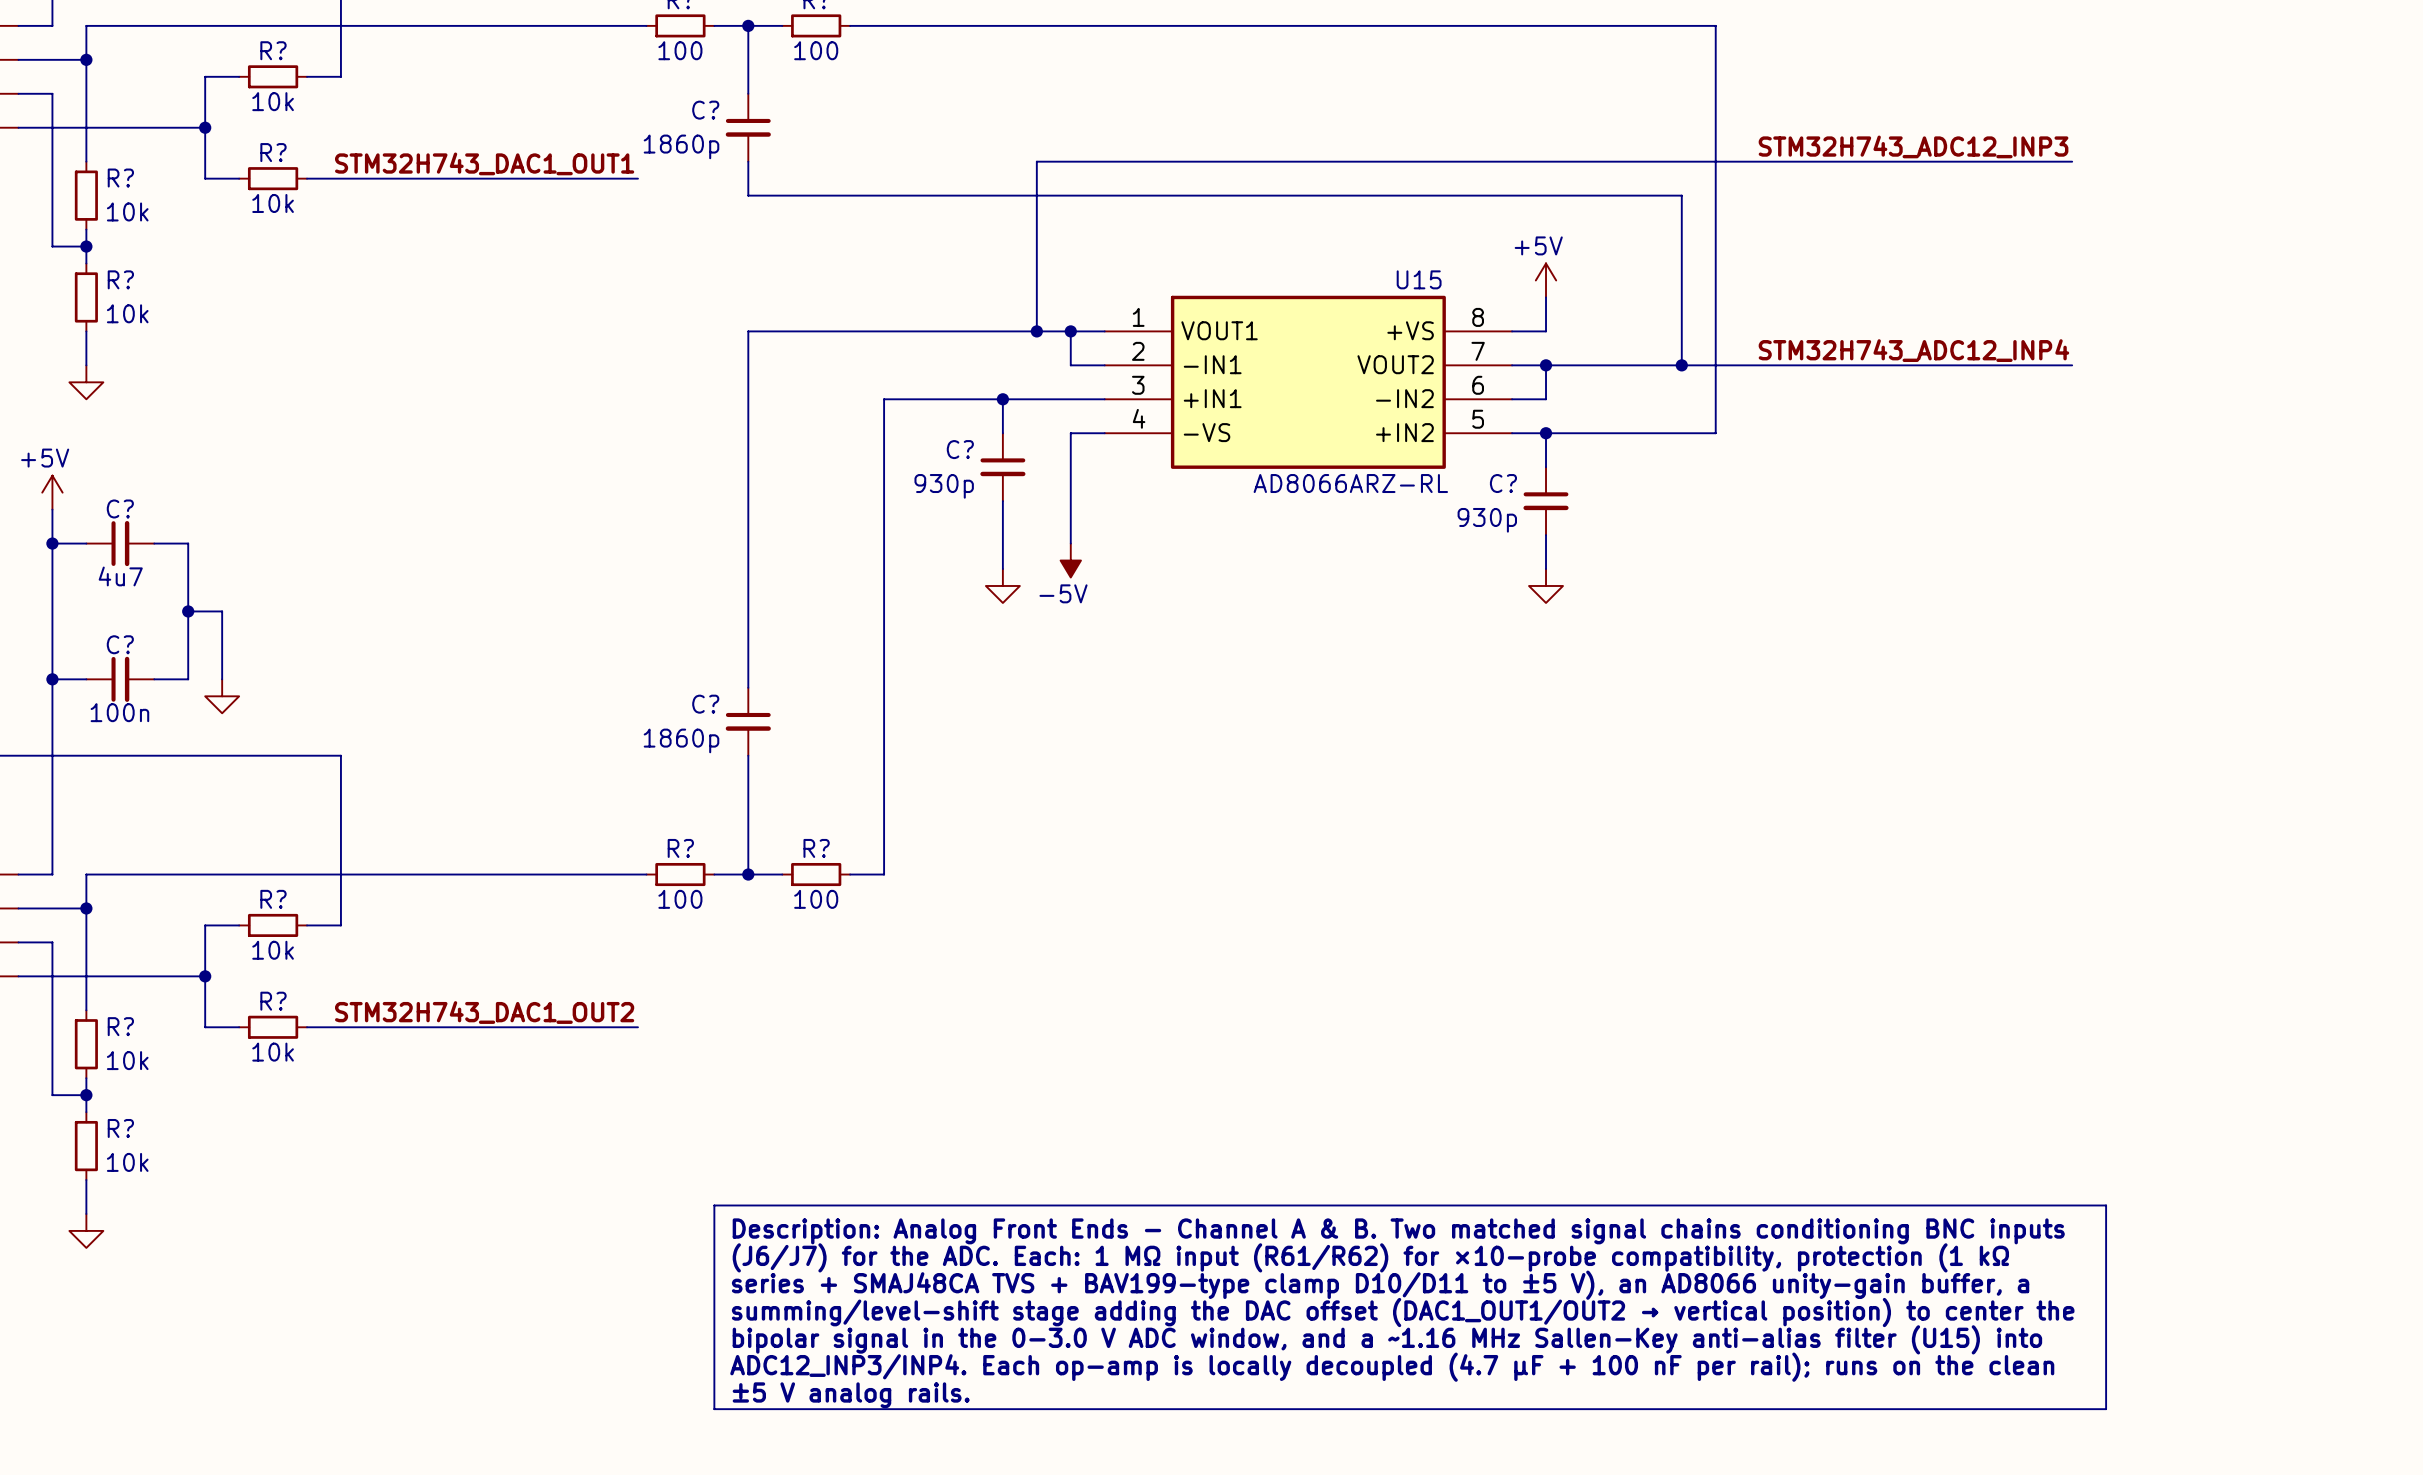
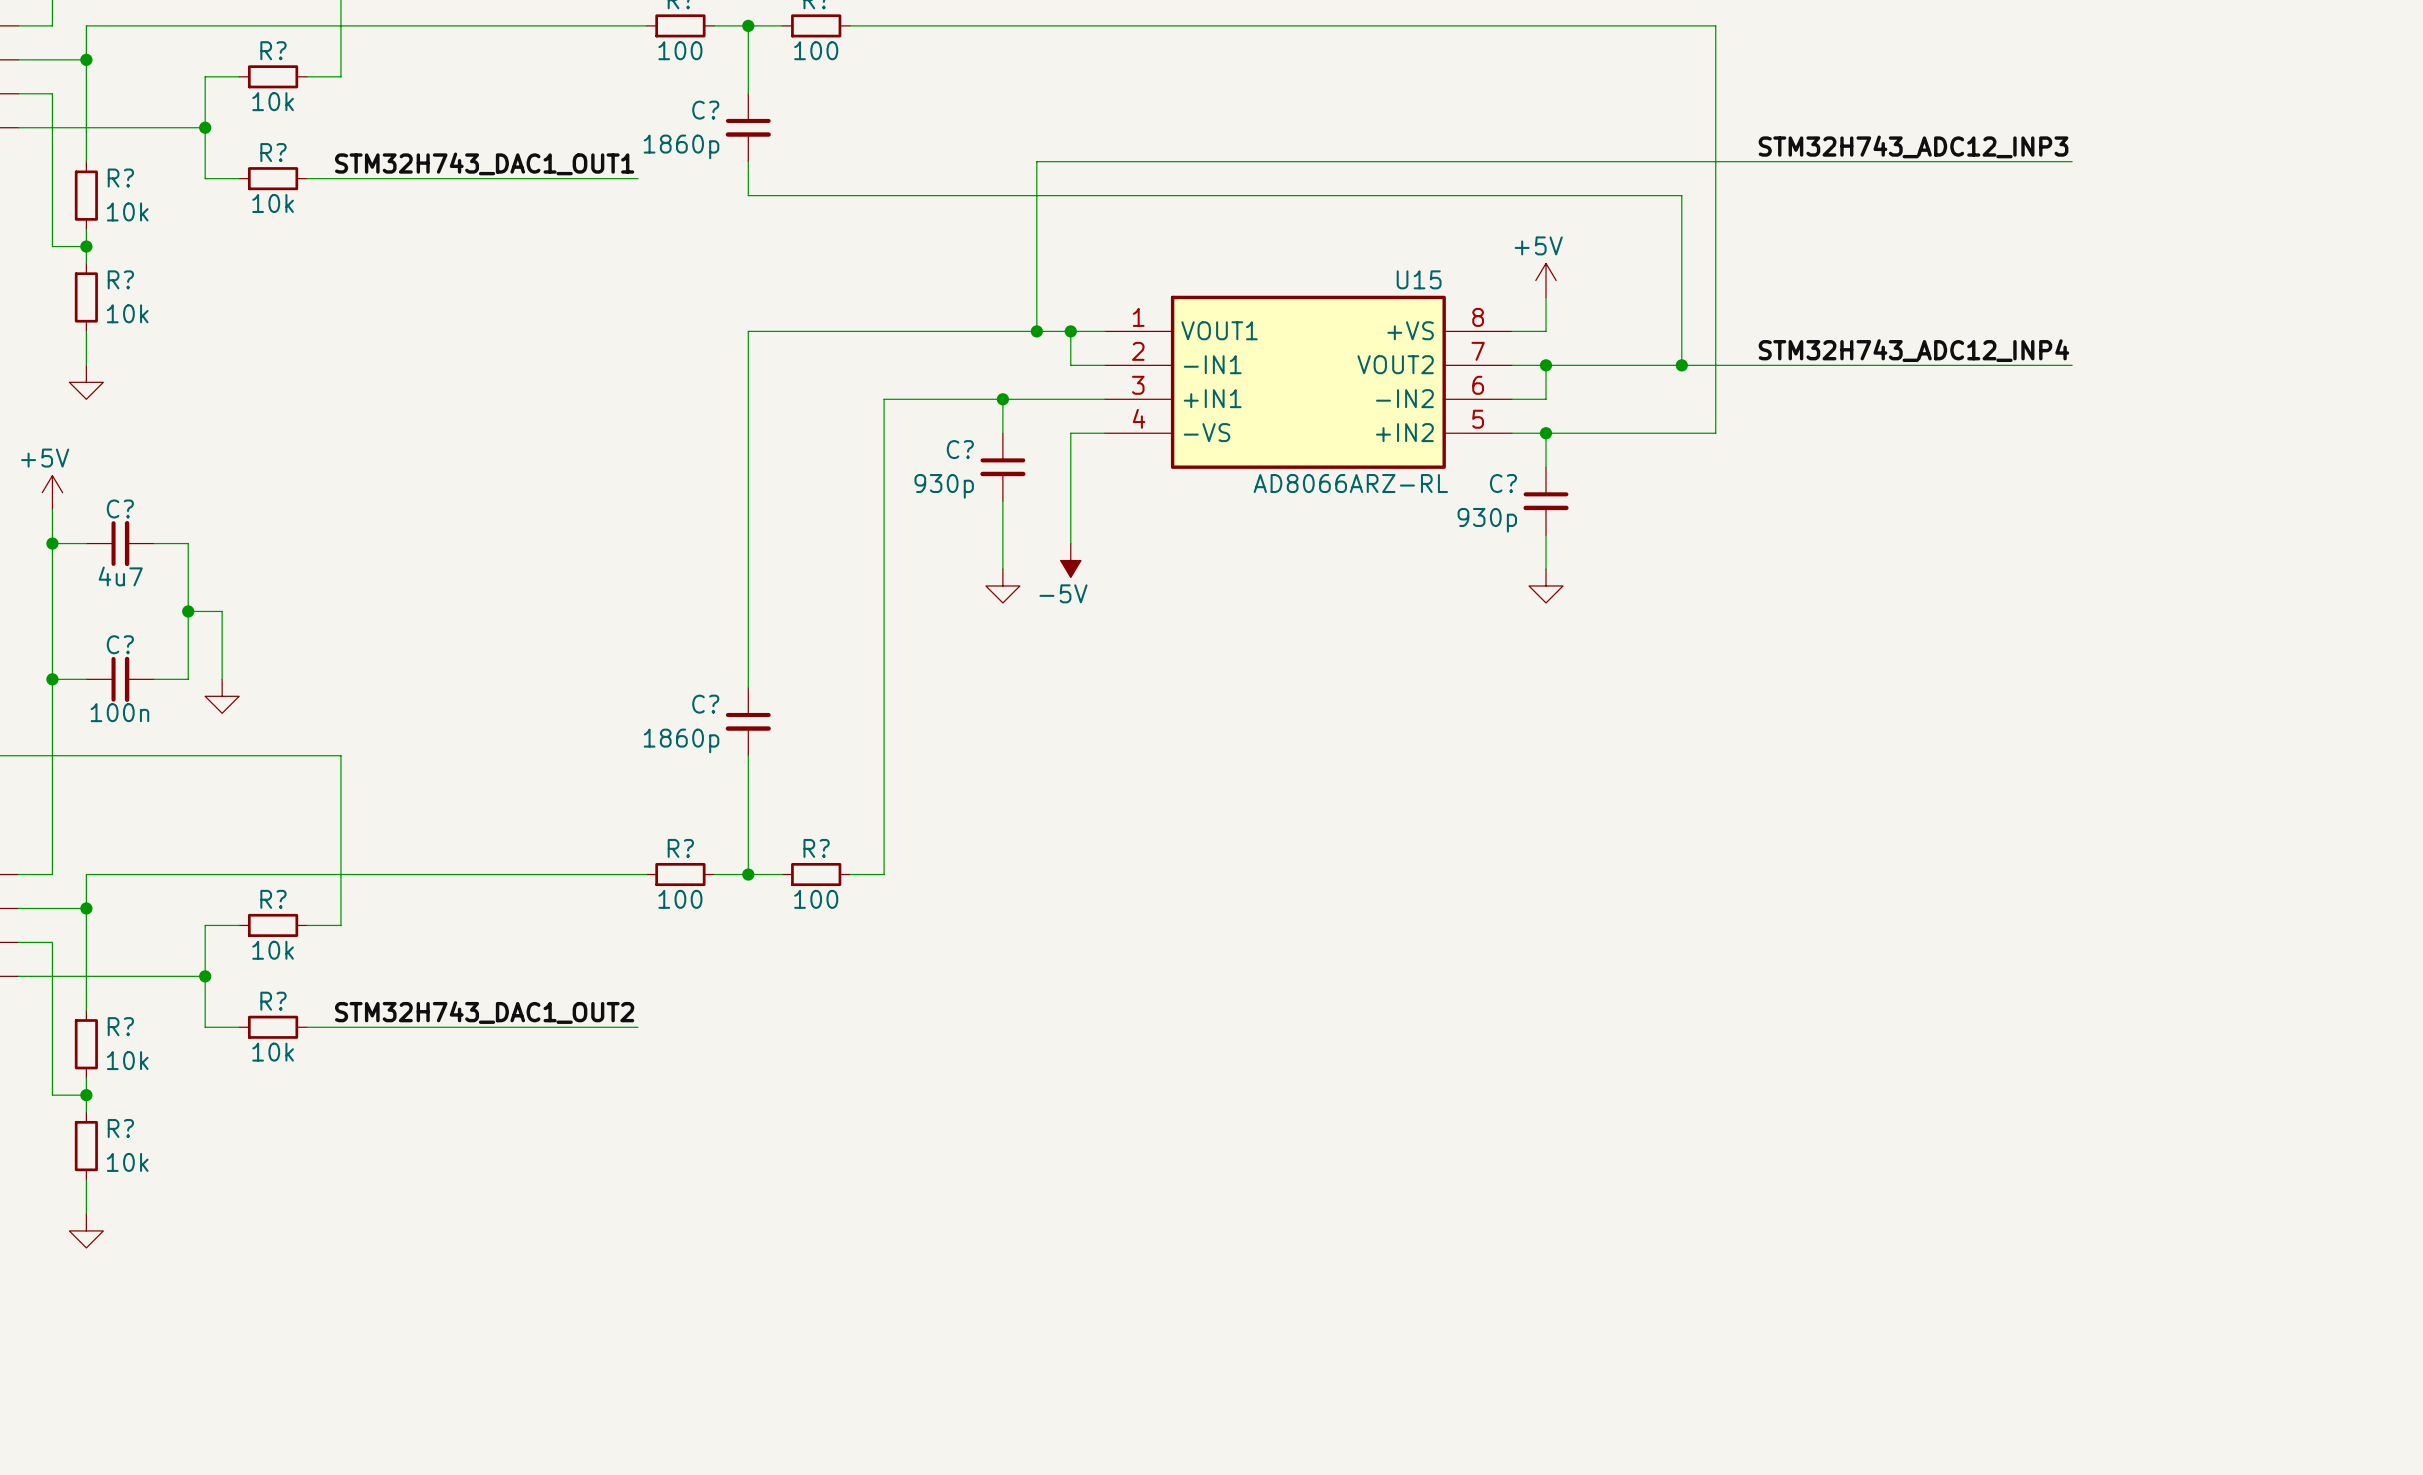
line: (714, 1205) (2106, 1205) (2106, 1409) (714, 1409) (714, 1205) -> none
text: Description: Analog Front Ends - Channel A & B. Two matched signal chains conditioning BNC inputs (1398, 1231) -> none
text: (J6/J7) for the ADC. Each: 1 MΩ input (R61/R62) for ×10-probe compatibility, protection (1 kΩ (1370, 1257) -> none
text: series + SMAJ48CA TVS + BAV199-type clamp D10/D11 to ±5 V), an AD8066 unity-gain buffer, a (1380, 1285) -> none
text: summing/level-shift stage adding the DAC offset (DAC1_OUT1/OUT2 → vertical position) to center the (1403, 1312) -> none
text: bipolar signal in the 0-3.0 V ADC window, and a ~1.16 MHz Sallen-Key anti-alias filter (U15) into (1387, 1339) -> none
text: ADC12_INP3/INP4. Each op-amp is locally decoupled (4.7 µF + 100 nF per rail); runs on the clean (1392, 1367) -> none
text: ±5 V analog rails. (851, 1395) -> none

